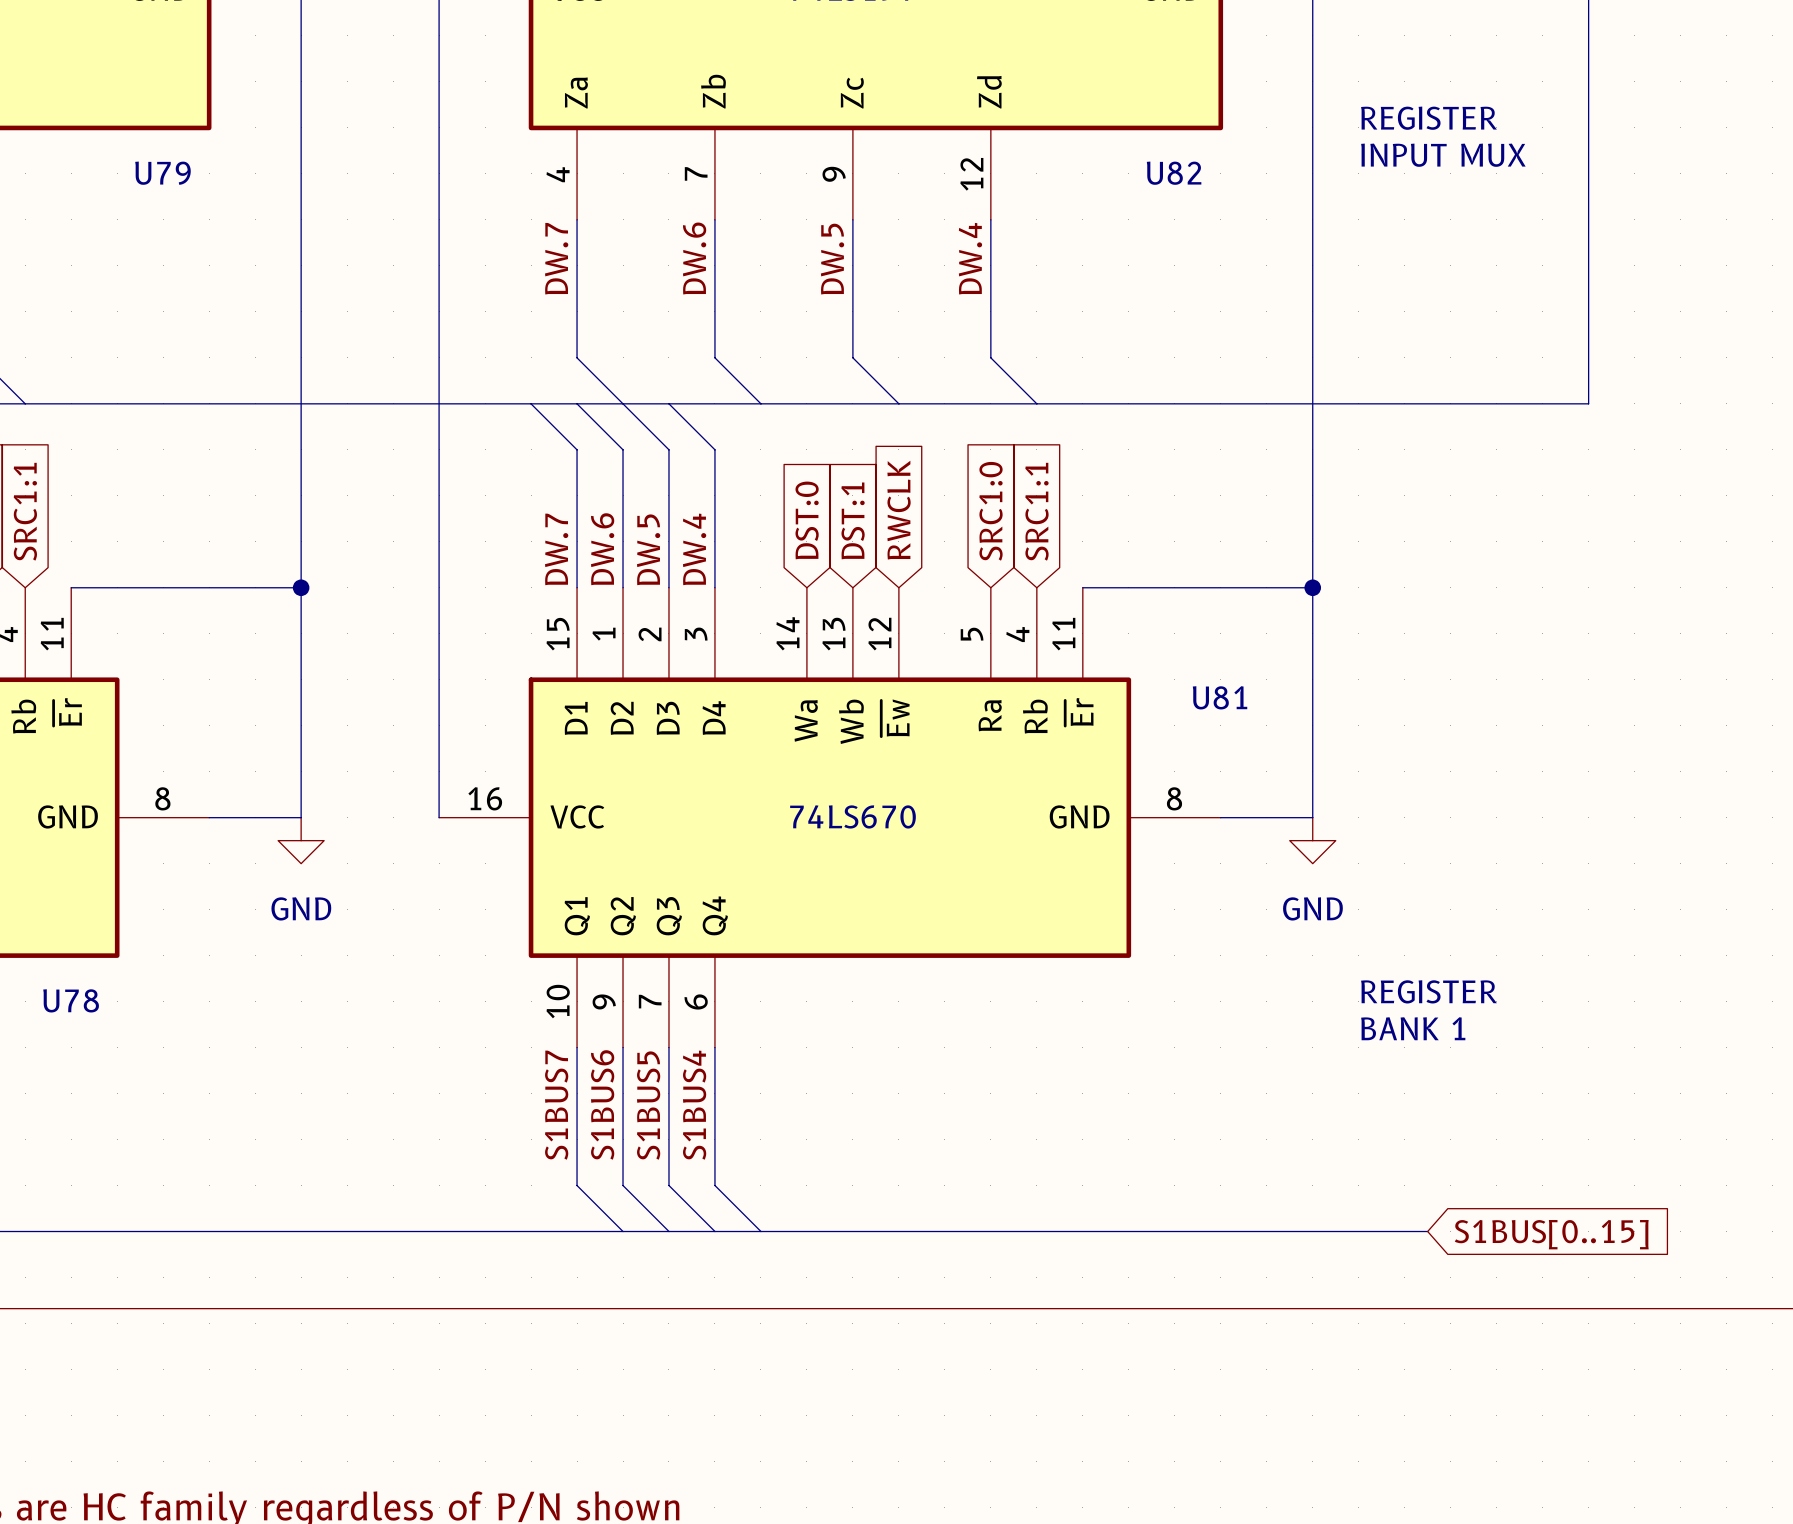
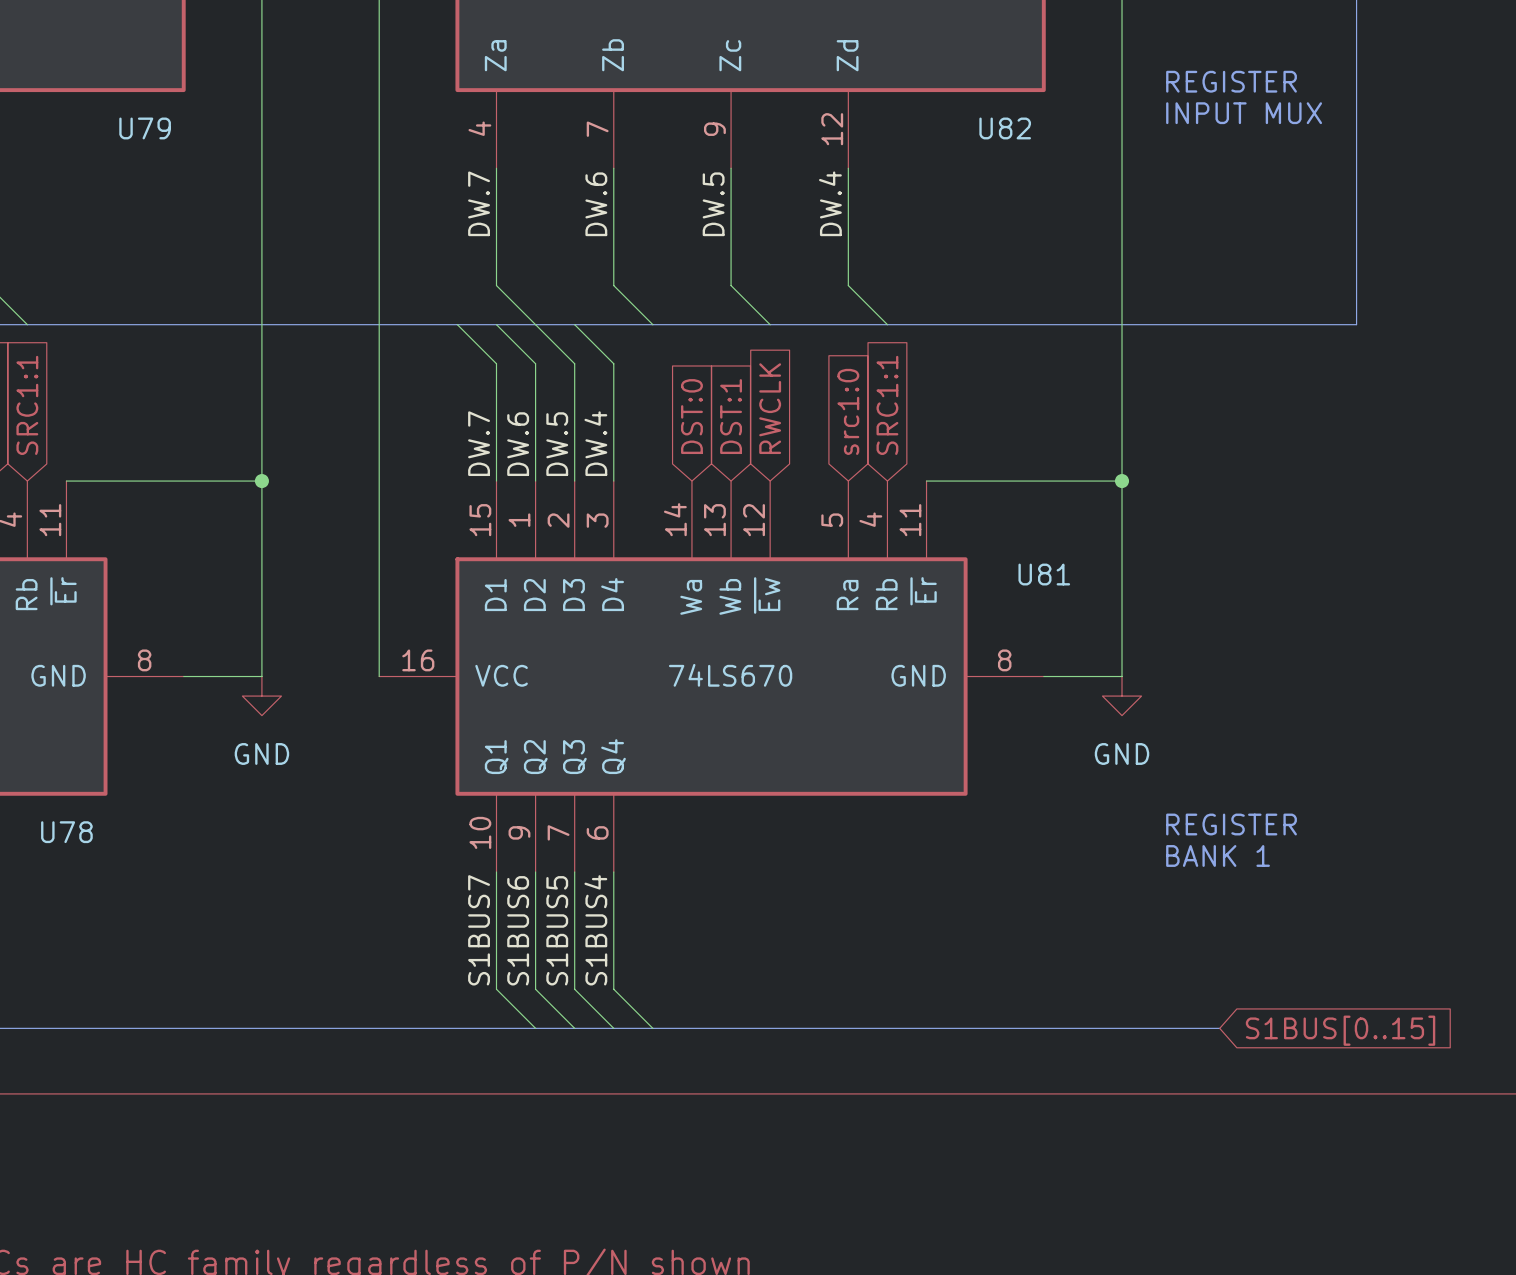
global label: SRC1:0 (990, 511) -> src1:0 (848, 411)

